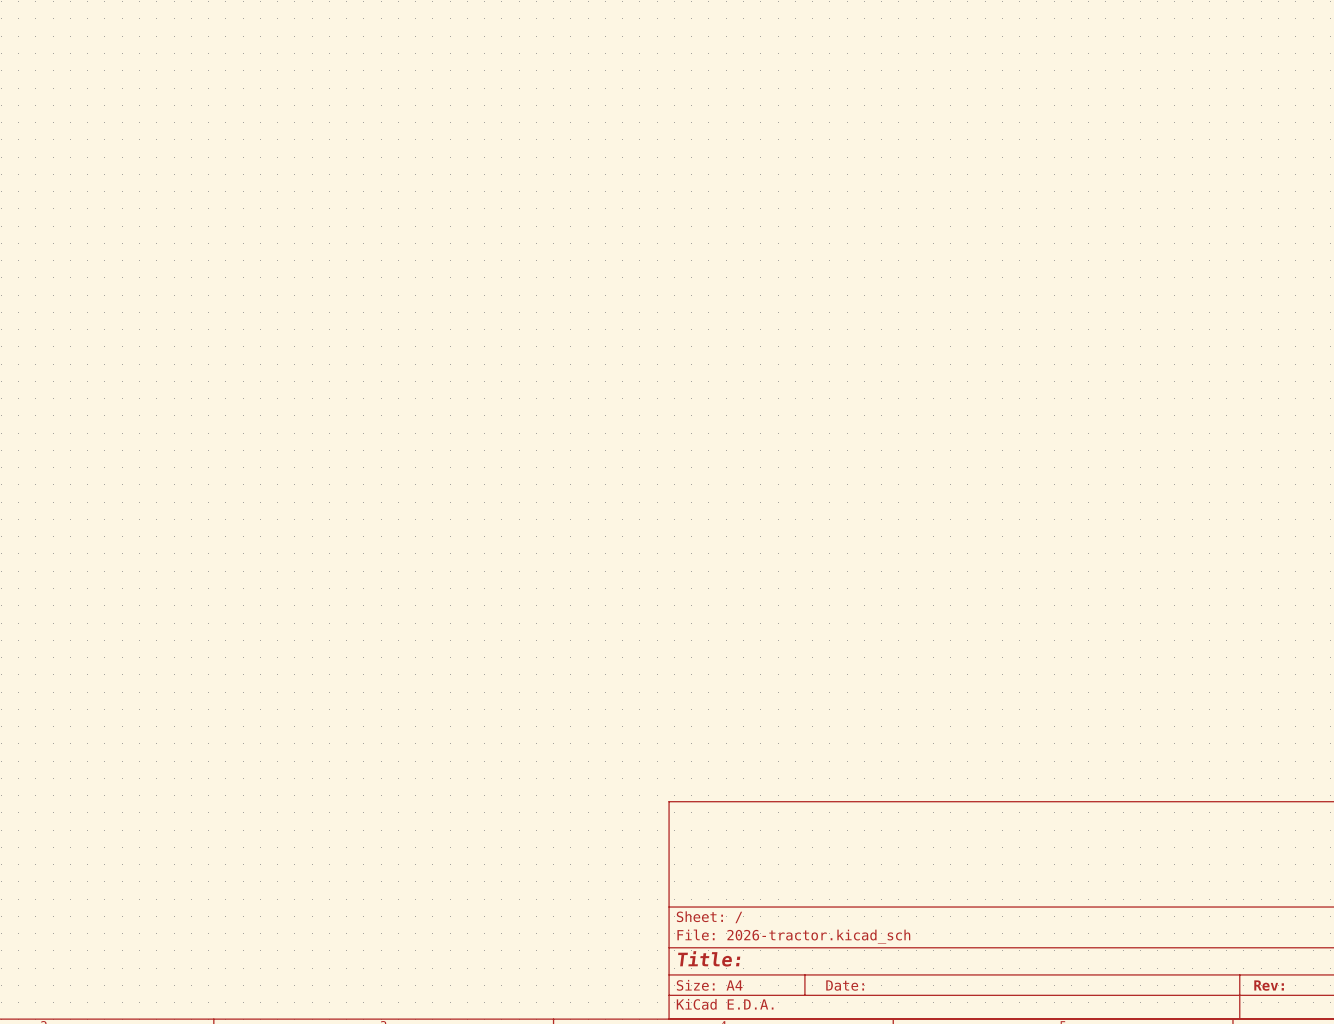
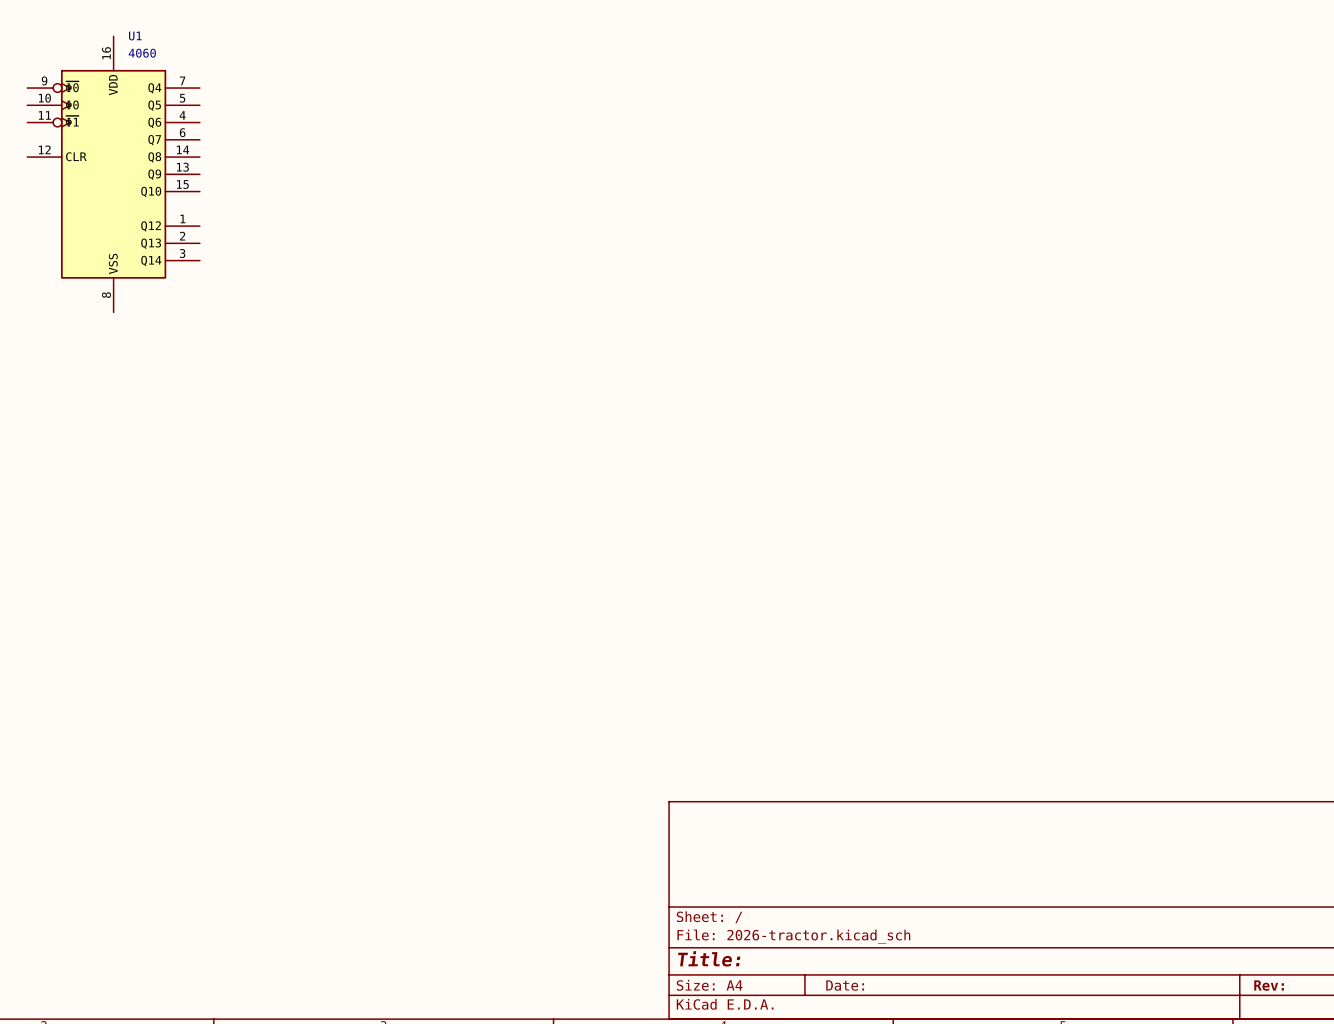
U1: none -> 4060 (113, 174)

